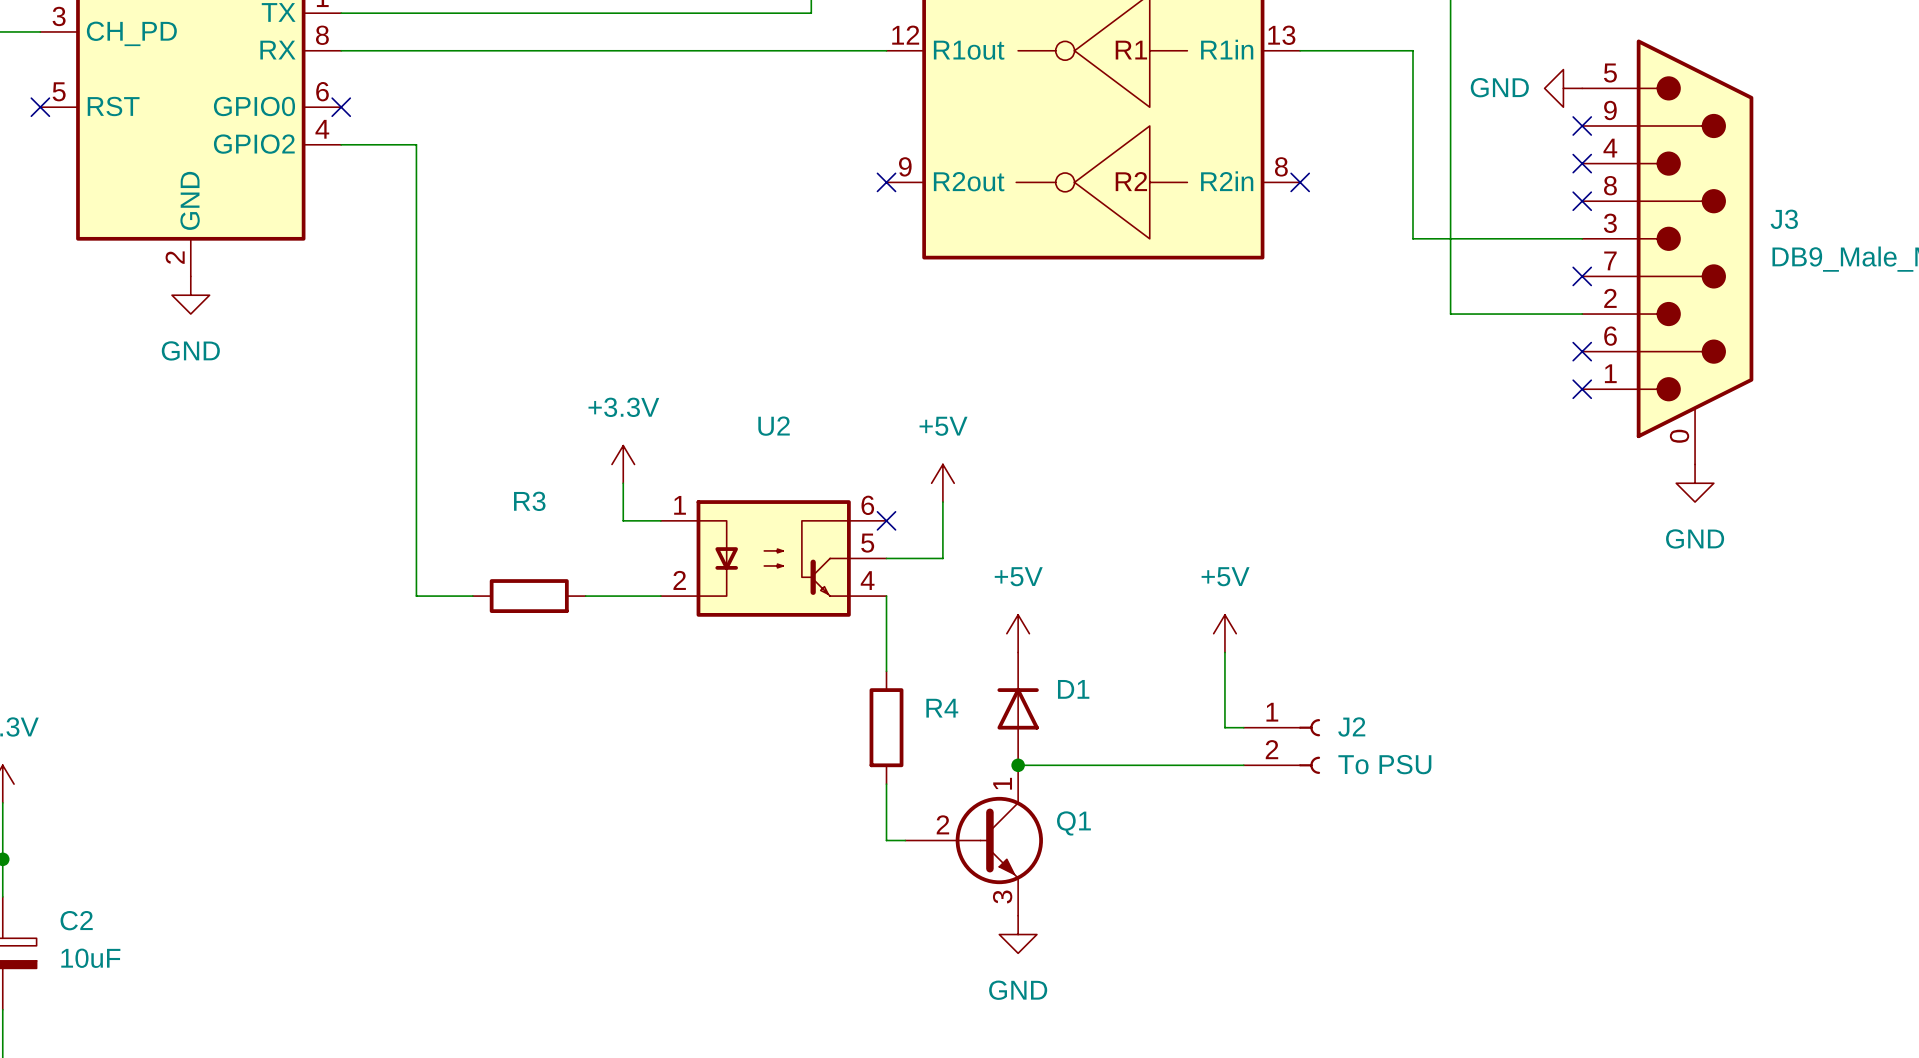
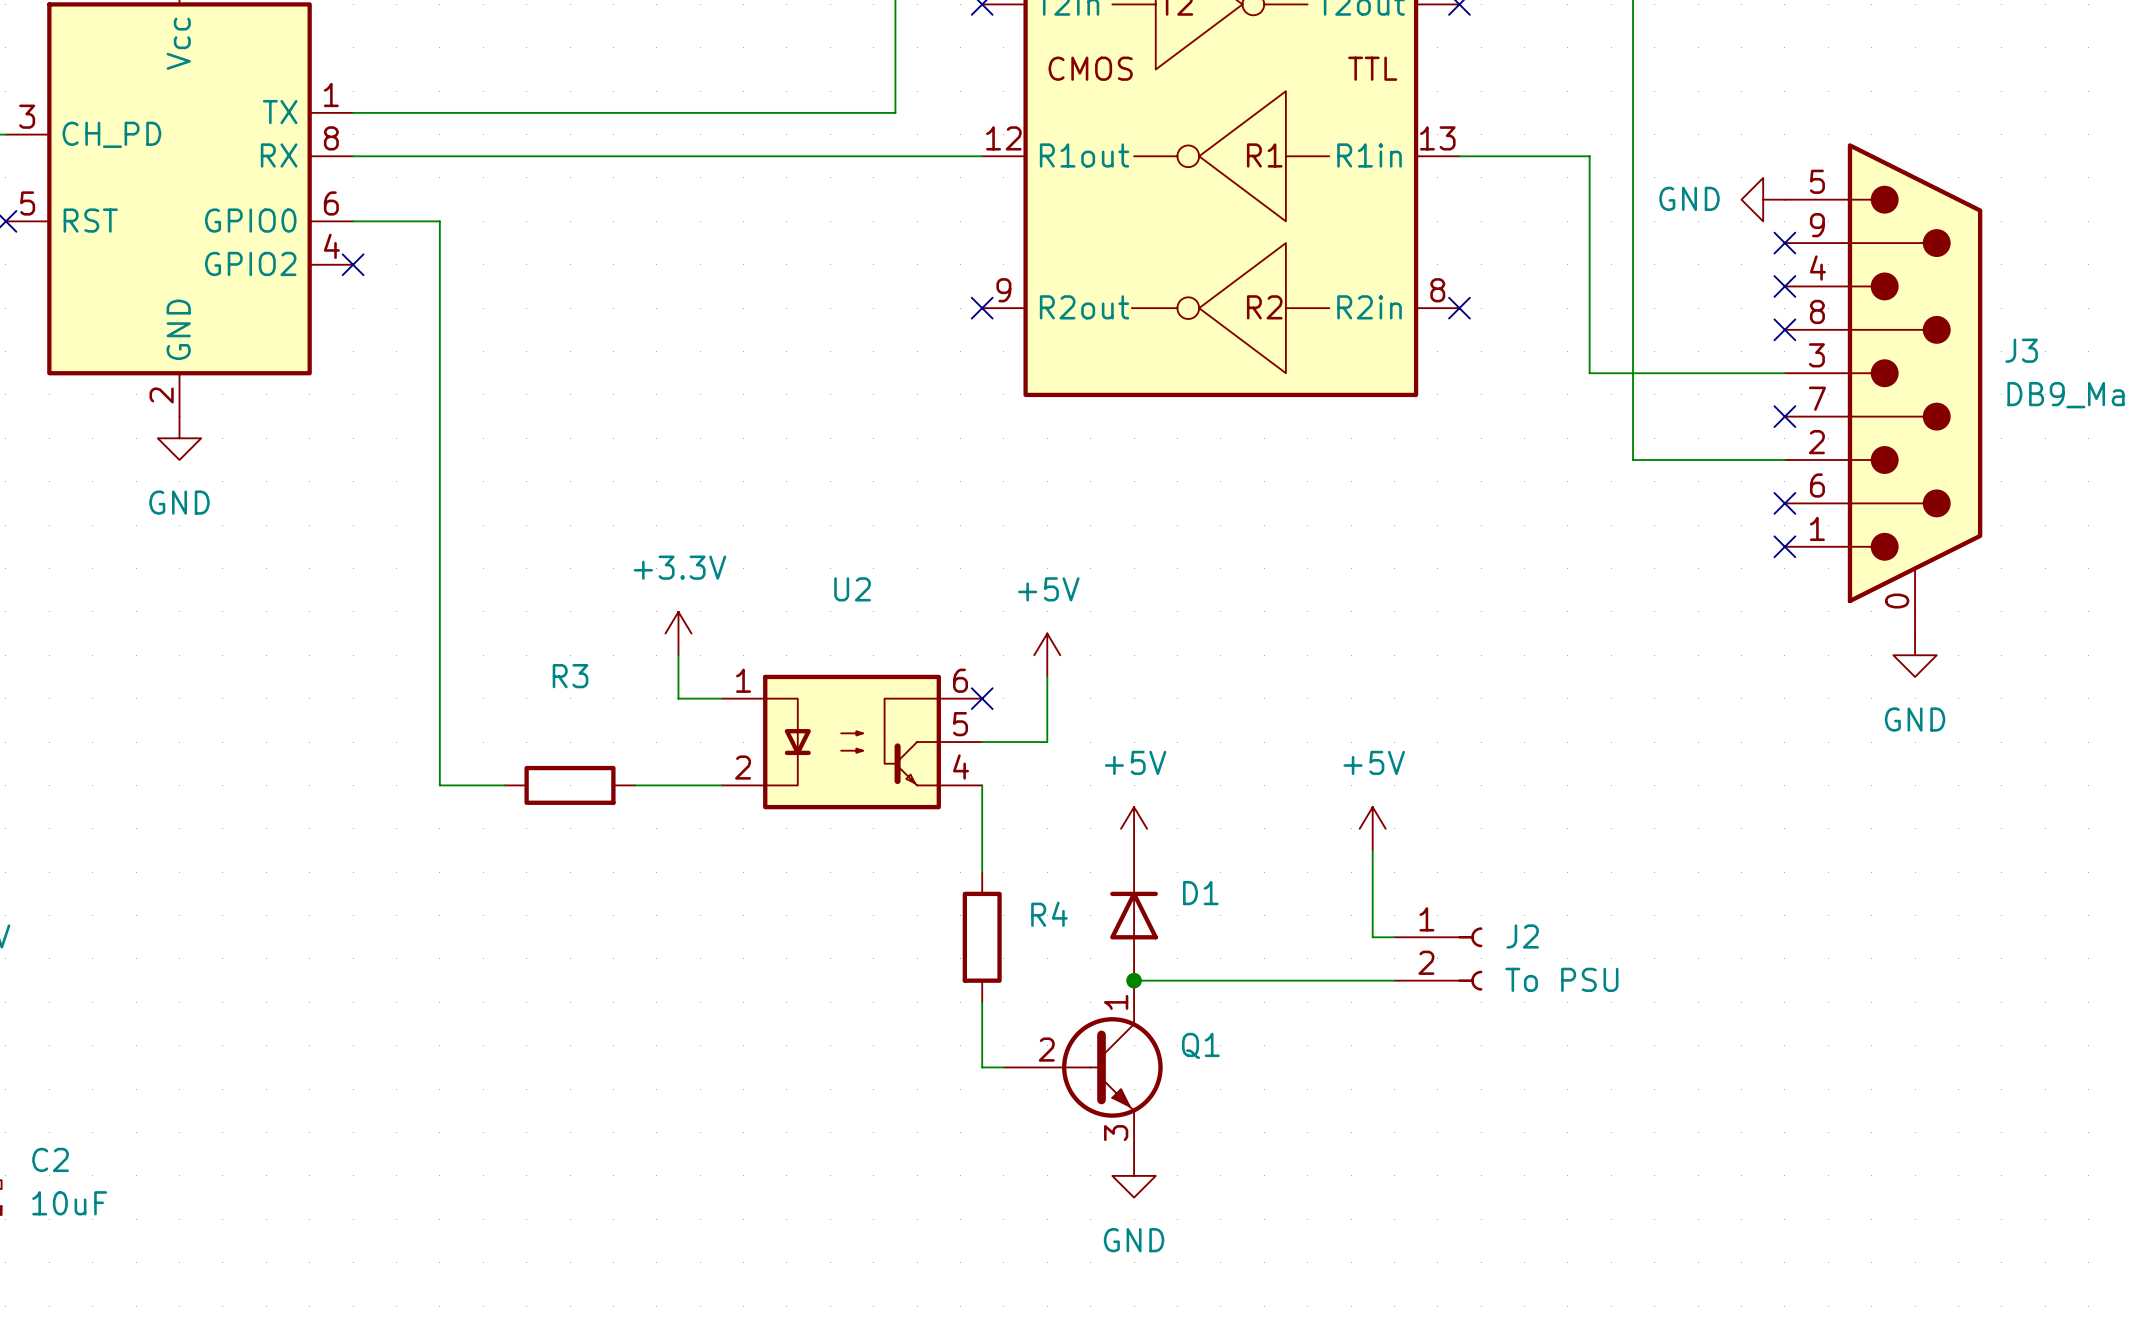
no-connect mark position: (341, 107) -> (353, 264)
wire: (341, 144) (416, 144) -> (353, 221) (439, 221) (439, 264)

